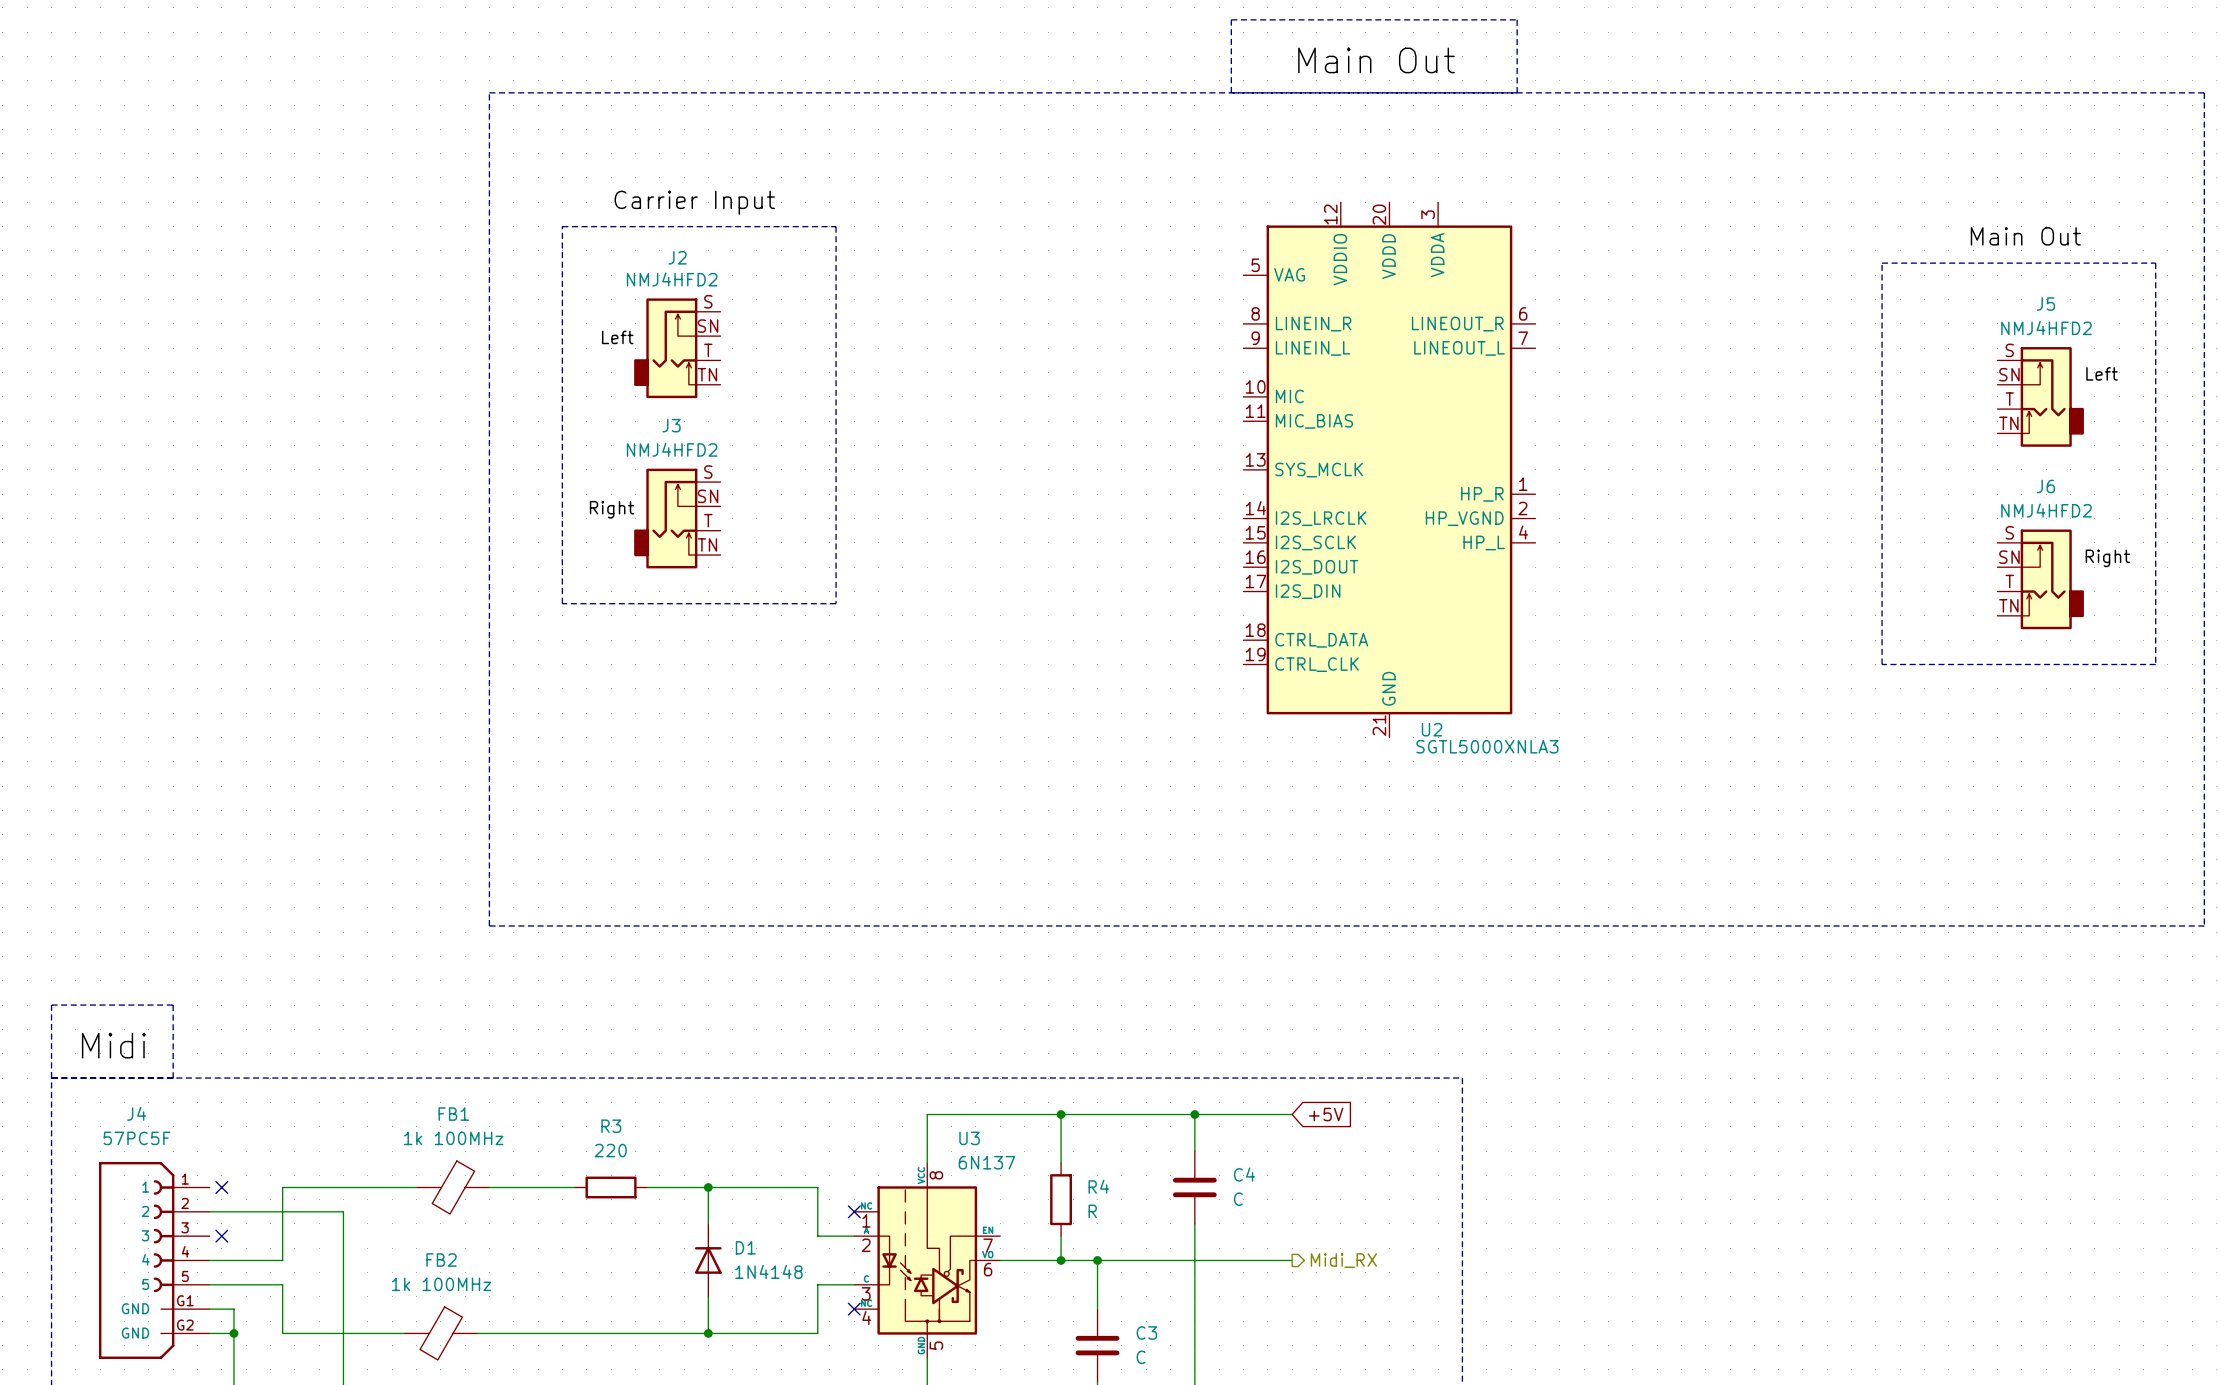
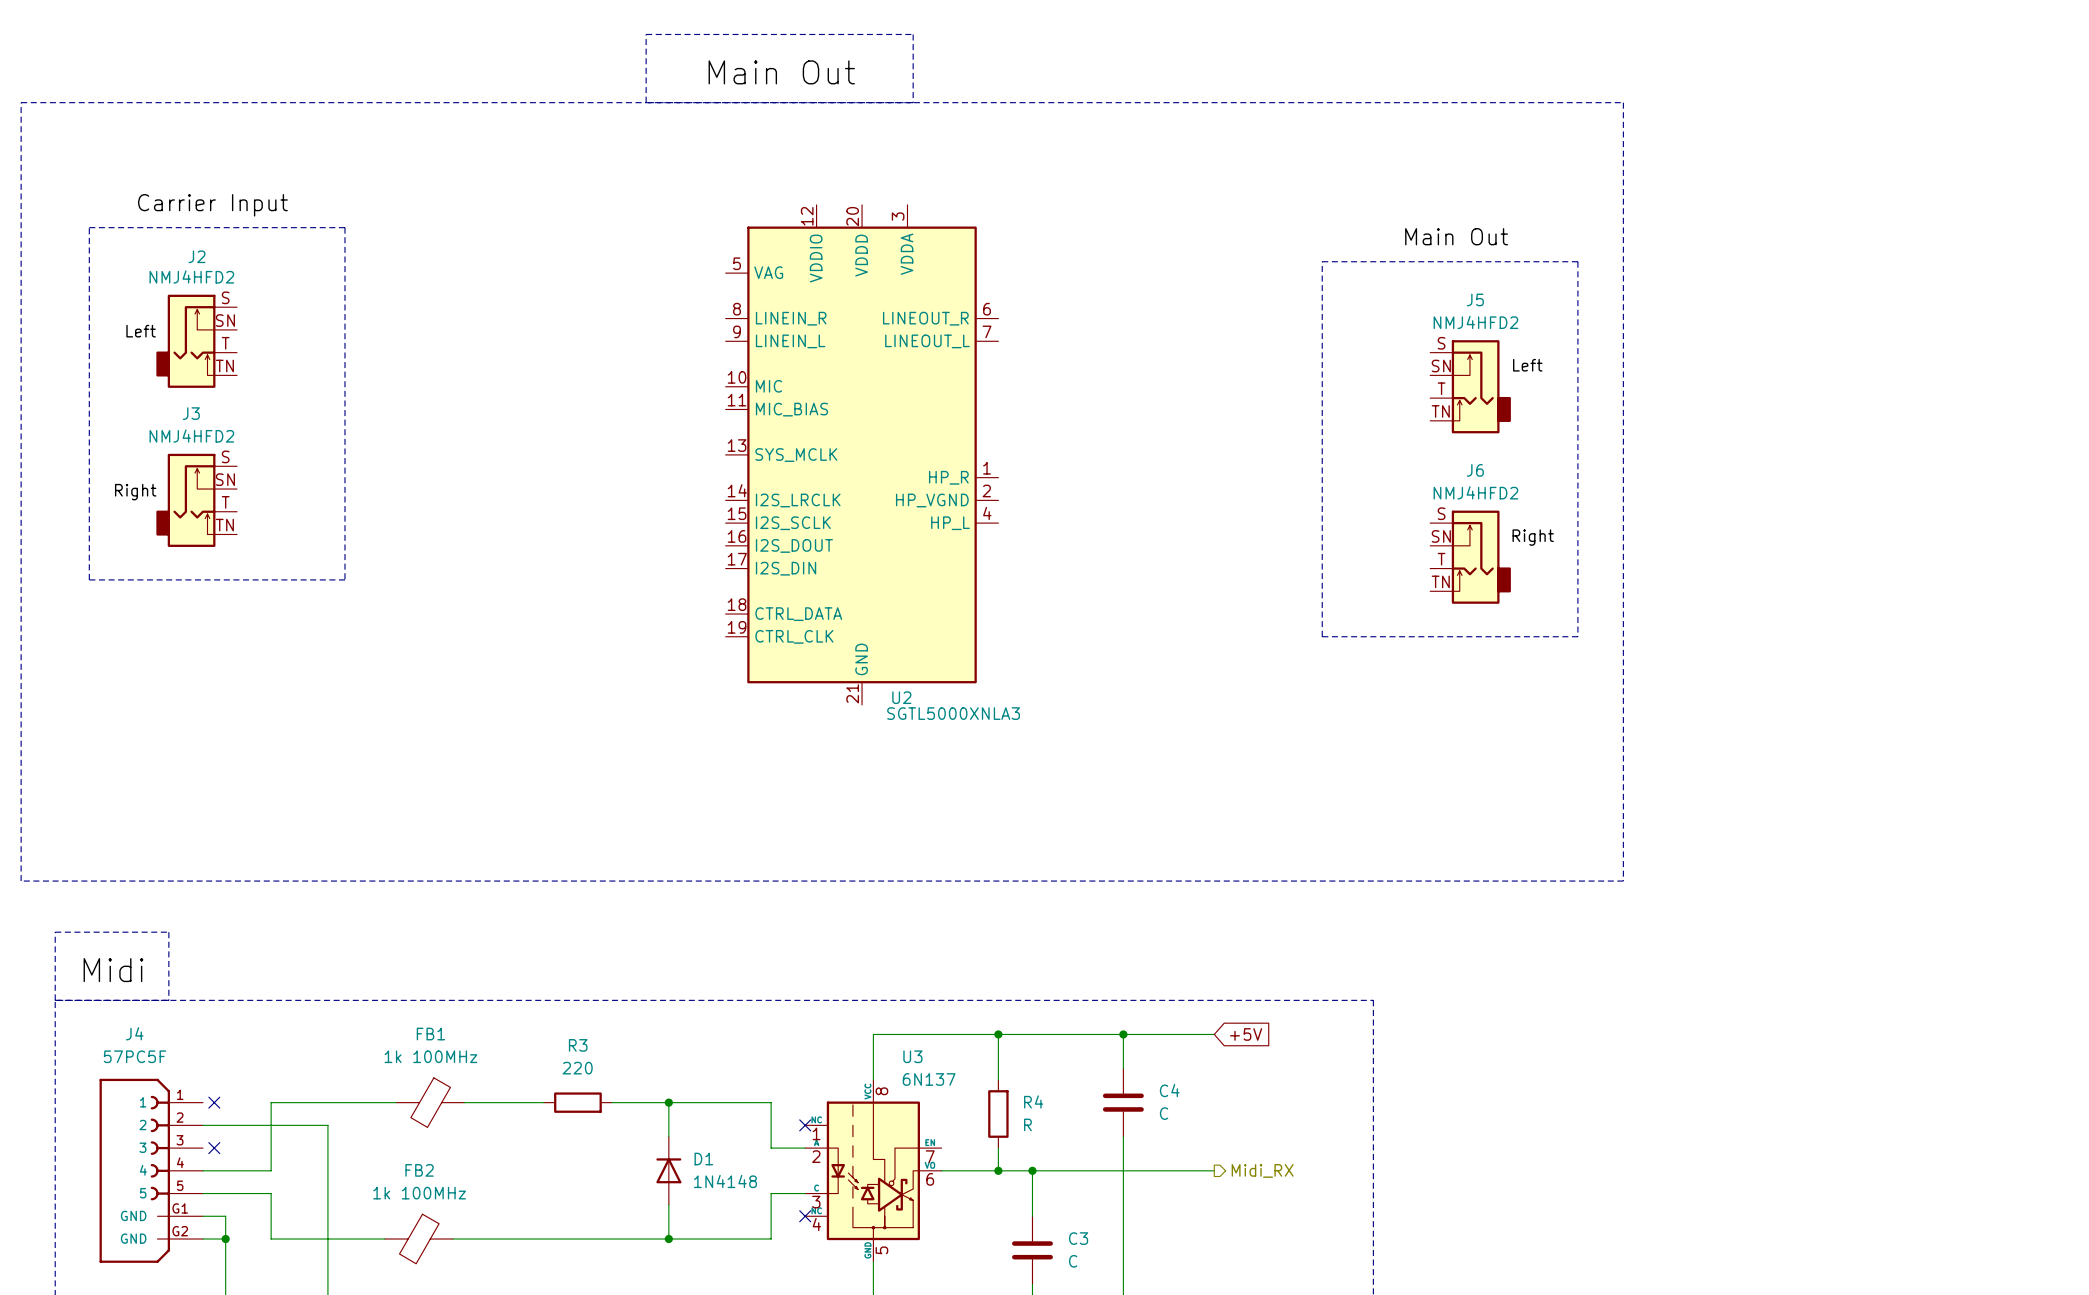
label: Main Out (1376, 60) -> none
label: none -> Main Out (781, 72)
line: (489, 92) (2204, 92) (2204, 925) (489, 925) (489, 92) -> (21, 102) (1623, 102) (1623, 881) (21, 881) (21, 102)
line: (1231, 92) (1231, 19) (1517, 19) (1517, 92) -> none
line: none -> (646, 102) (646, 34) (913, 34) (913, 102)
label: Carrier Input (694, 202) -> none
line: (562, 226) (836, 226) (836, 603) (562, 603) (562, 226) -> none
label: none -> Carrier Input (212, 205)
label: Main Out (2025, 236) -> none
line: none -> (89, 227) (344, 227) (344, 579) (89, 579) (89, 227)
label: none -> Main Out (1456, 236)
line: (1882, 263) (2155, 263) (2155, 664) (1882, 664) (1882, 263) -> none
line: none -> (1322, 261) (1577, 261) (1577, 636) (1322, 636) (1322, 261)
label: Left (617, 337) -> none
J2 position: (677, 348) -> (196, 341)
label: none -> Left (141, 331)
label: Left (2102, 373) -> none
J5 position: (2040, 396) -> (1470, 386)
label: none -> Left (1527, 365)
U2 position: (1389, 469) -> (862, 454)
label: Right (611, 509) -> none
J3 position: (677, 518) -> (196, 500)
label: none -> Right (135, 492)
label: Right (2107, 558) -> none
J6 position: (2040, 579) -> (1470, 557)
label: none -> Right (1533, 537)

